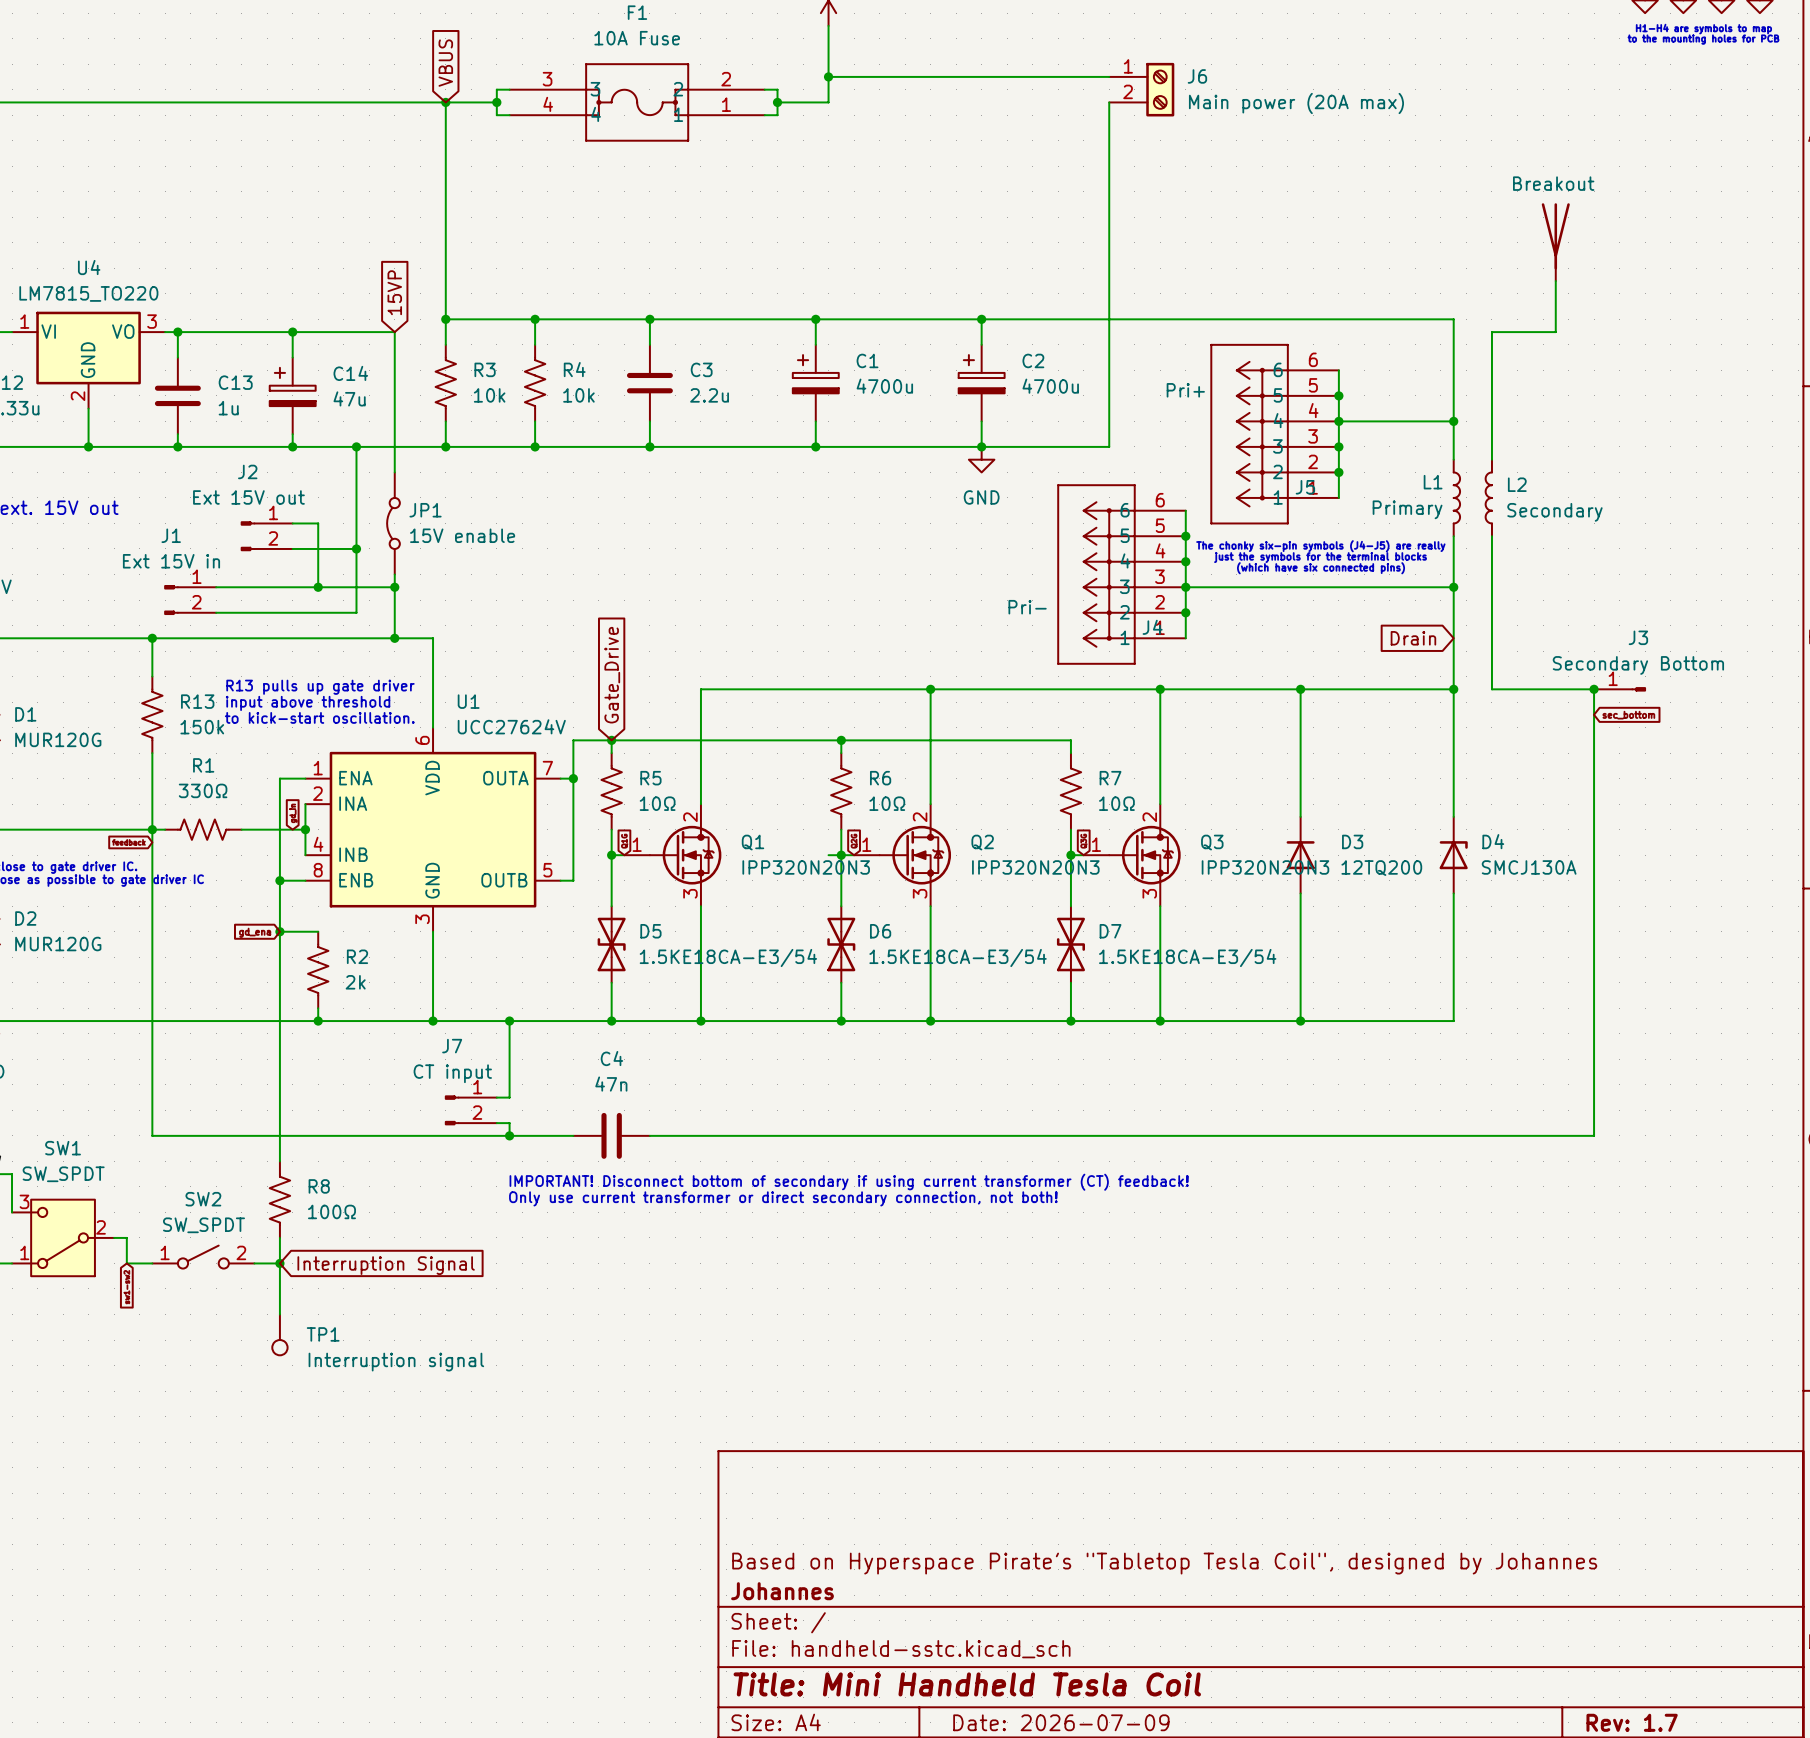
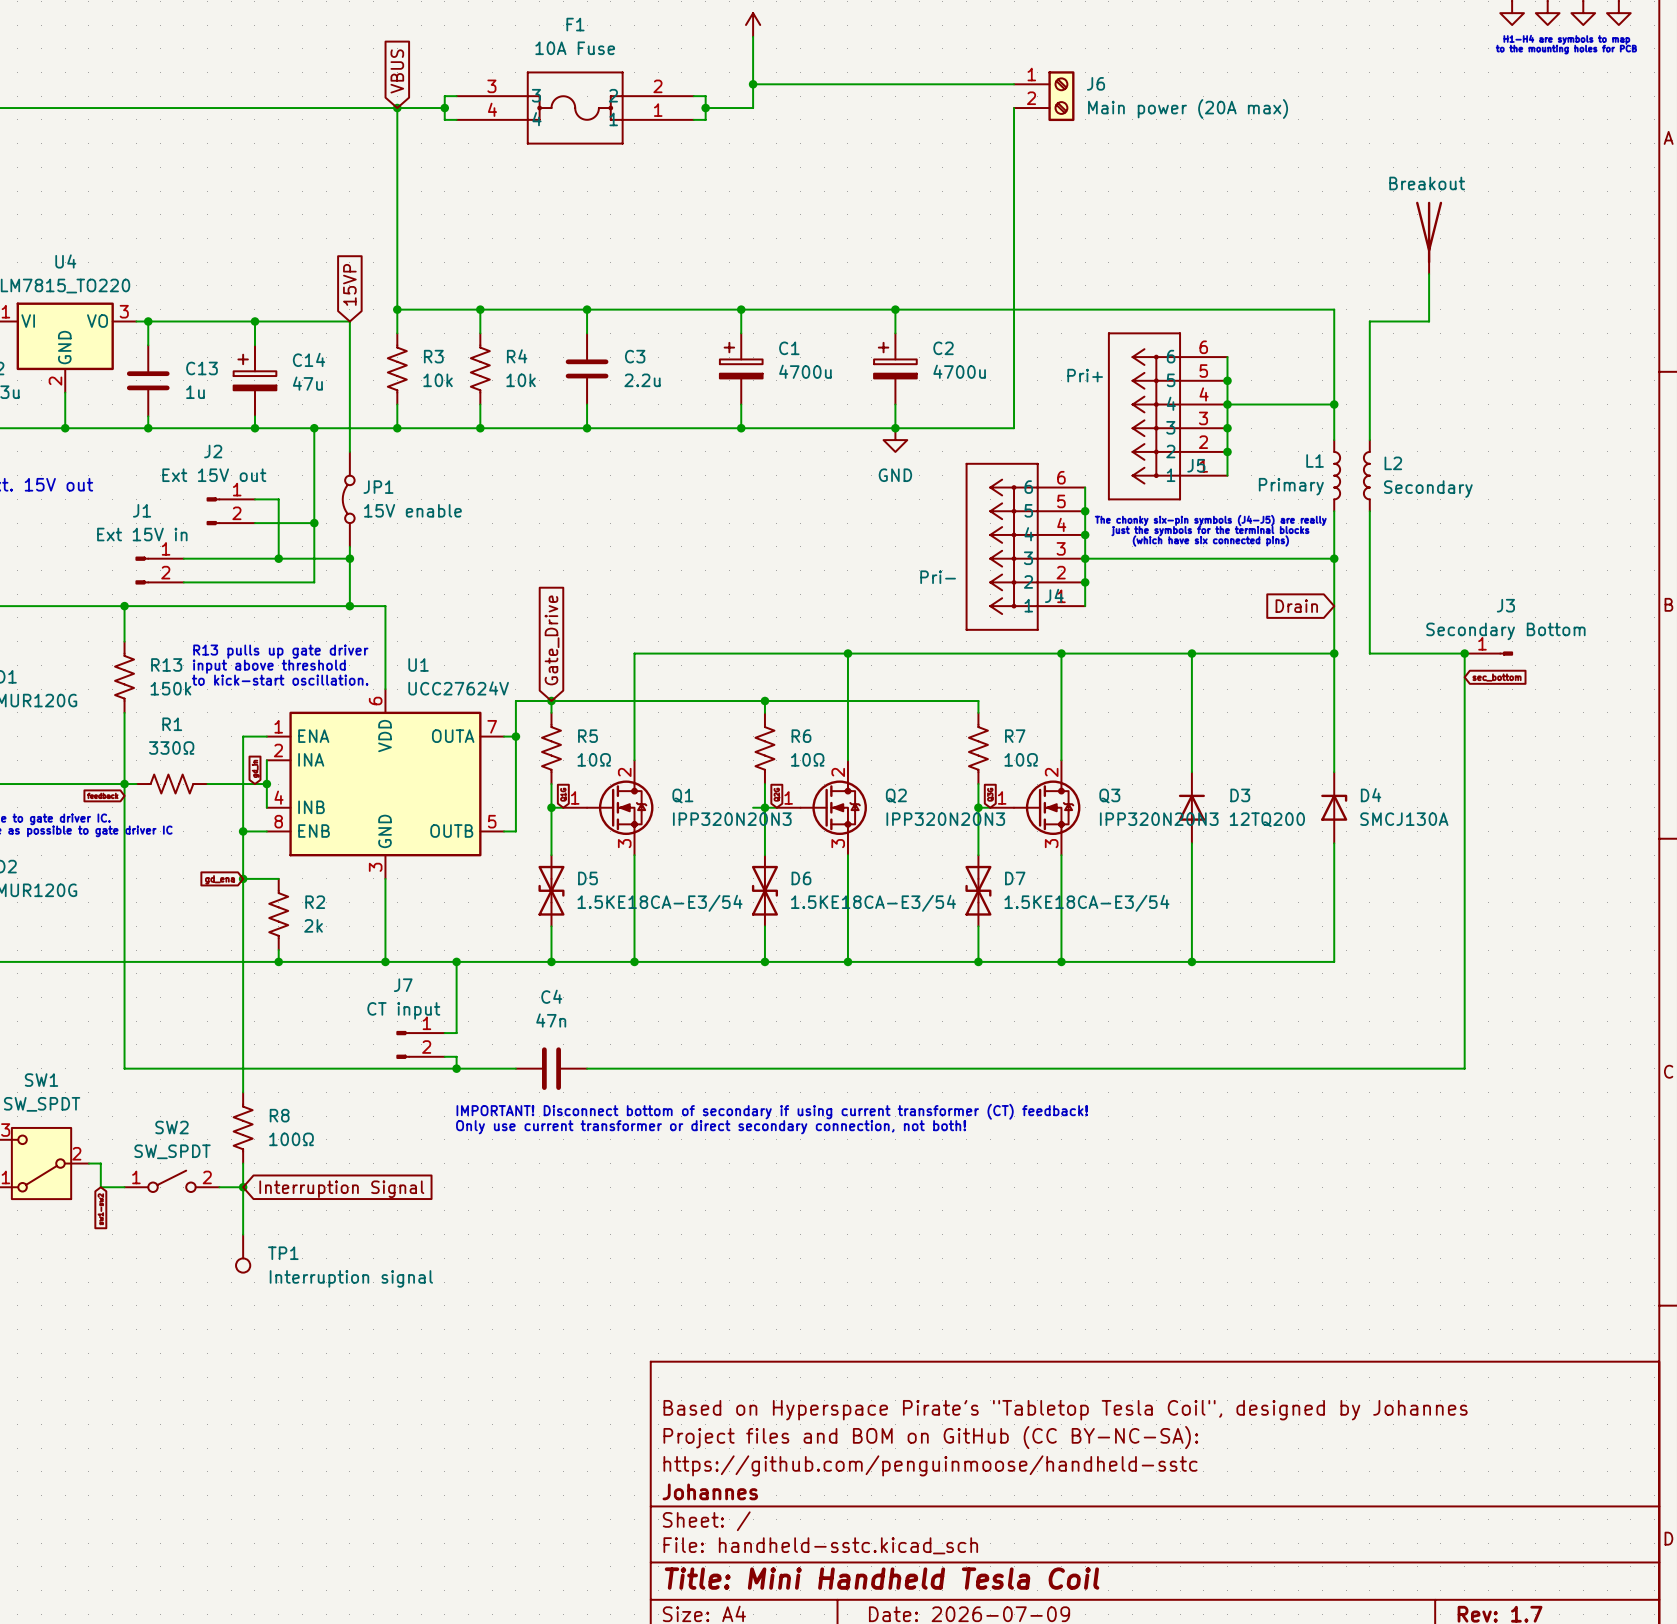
title block: none -> Based on Hyperspace Pirate's "Tabletop Tesla Coil", designed by Johannes (1065, 1410)
title block: none -> Project files and BOM on GitHub (CC BY-NC-SA): (930, 1437)
title block: Based on Hyperspace Pirate's "Tabletop Tesla Coil", designed by Johannes (1164, 1563) -> https://github.com/penguinmoose/handheld-sstc (930, 1465)

